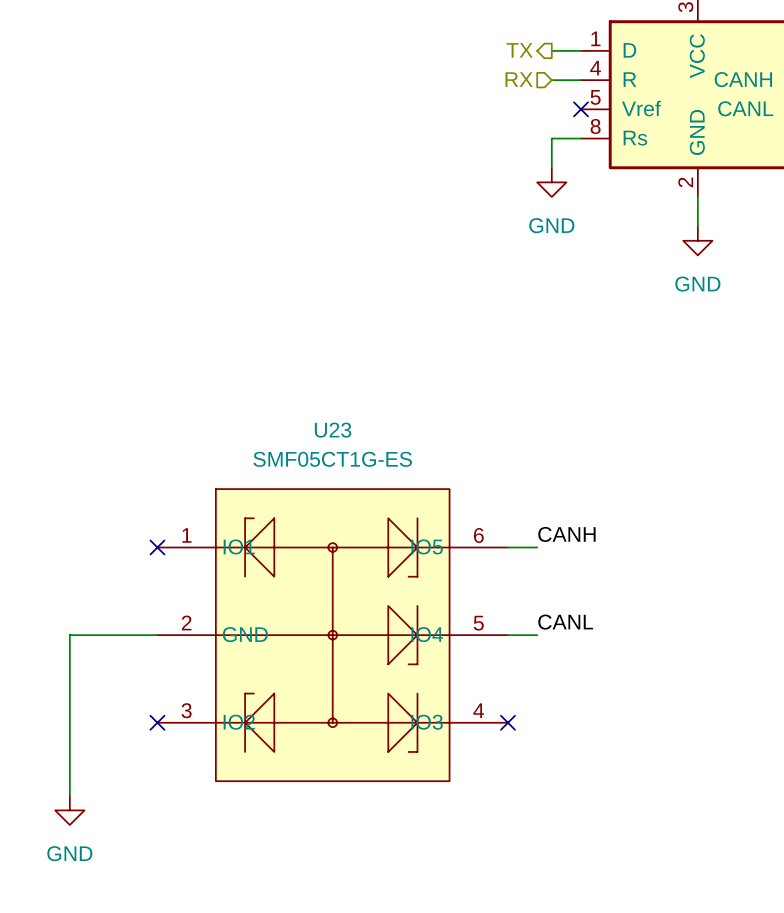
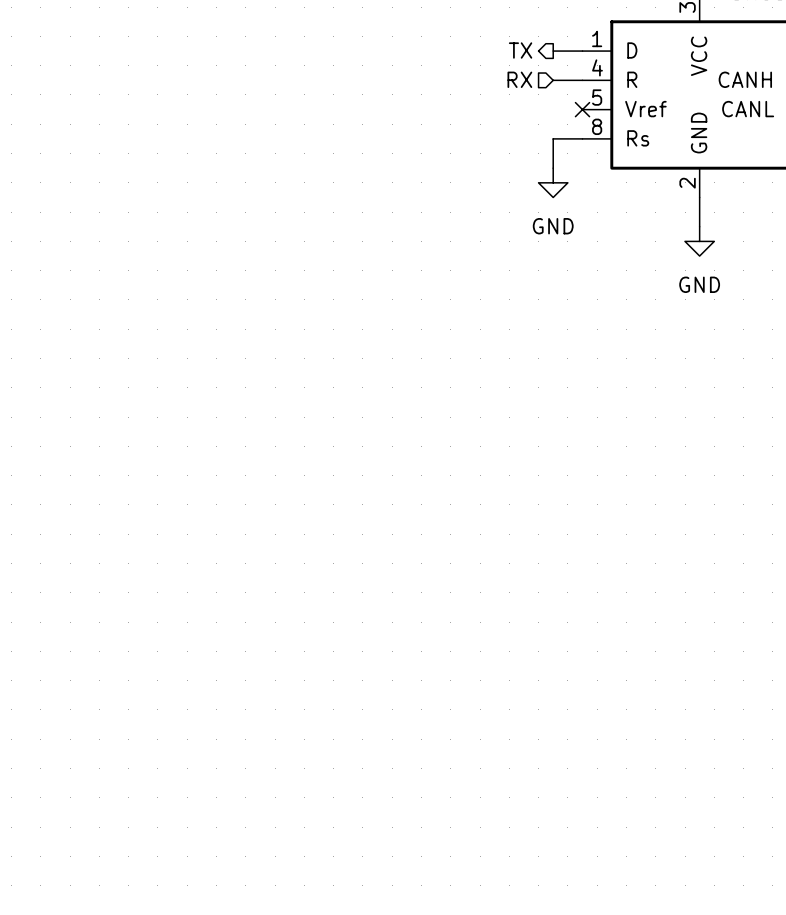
label: CANH (566, 534) -> none
no-connect mark: (157, 547) -> none
wire: (507, 547) (537, 547) -> none
label: CANL (565, 622) -> none
wire: (157, 635) (69, 635) (69, 795) -> none
U23: SMF05CT1G-ES (332, 635) -> none
wire: (507, 635) (537, 635) -> none
no-connect mark: (157, 722) -> none
no-connect mark: (507, 722) -> none
power symbol: GND (69, 810) -> none

